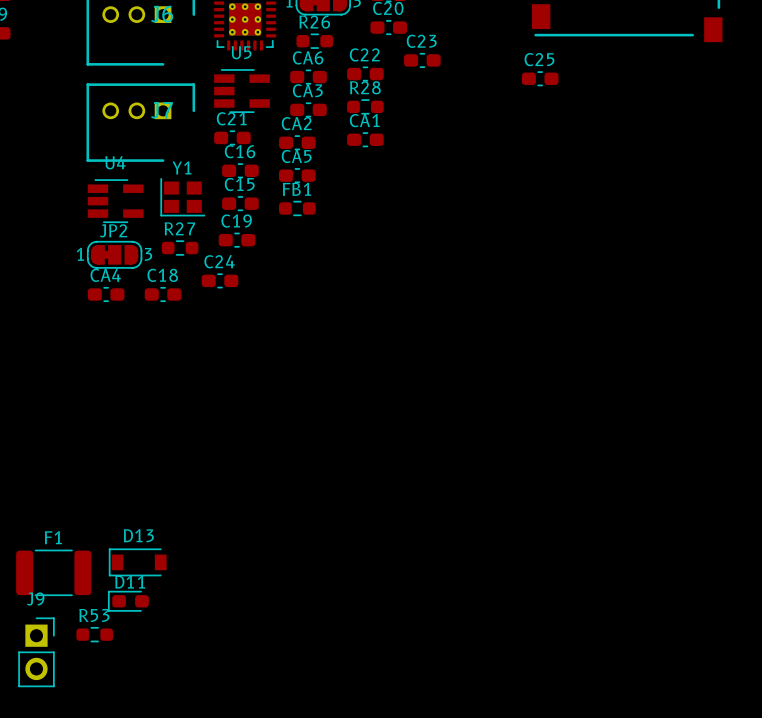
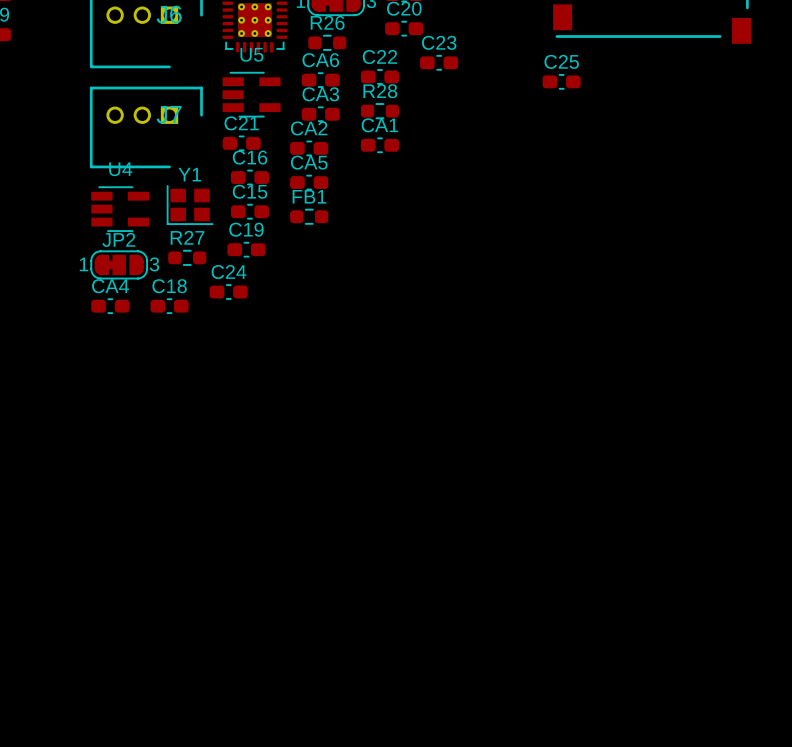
D13: (137, 562) -> none
F1: (53, 572) -> none
D11: (128, 601) -> none
R53: (94, 634) -> none
J9: (36, 652) -> none

